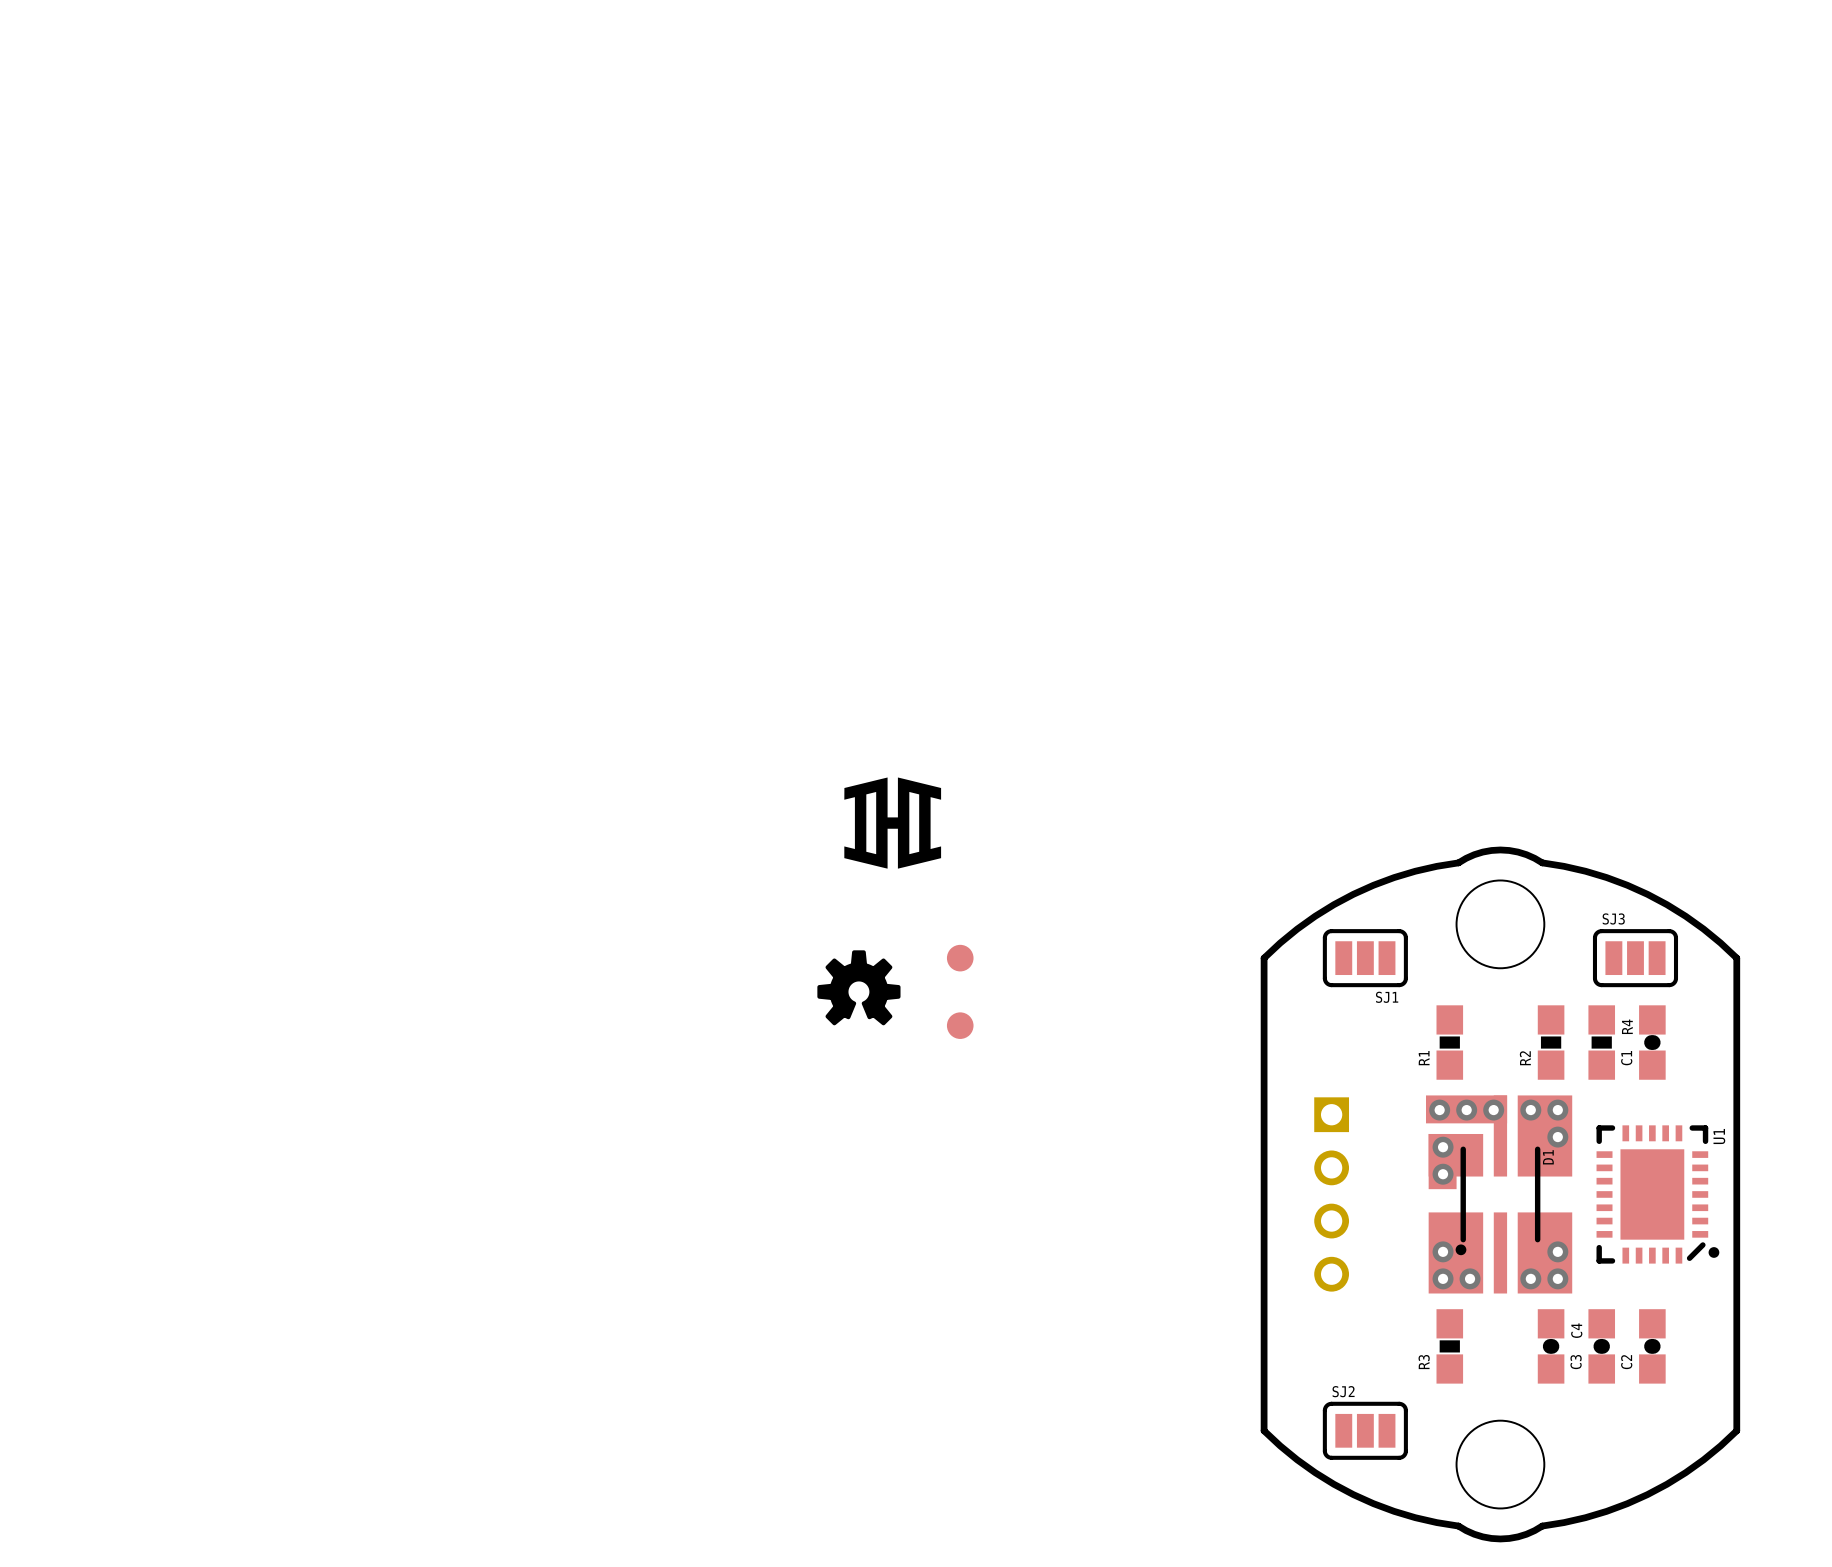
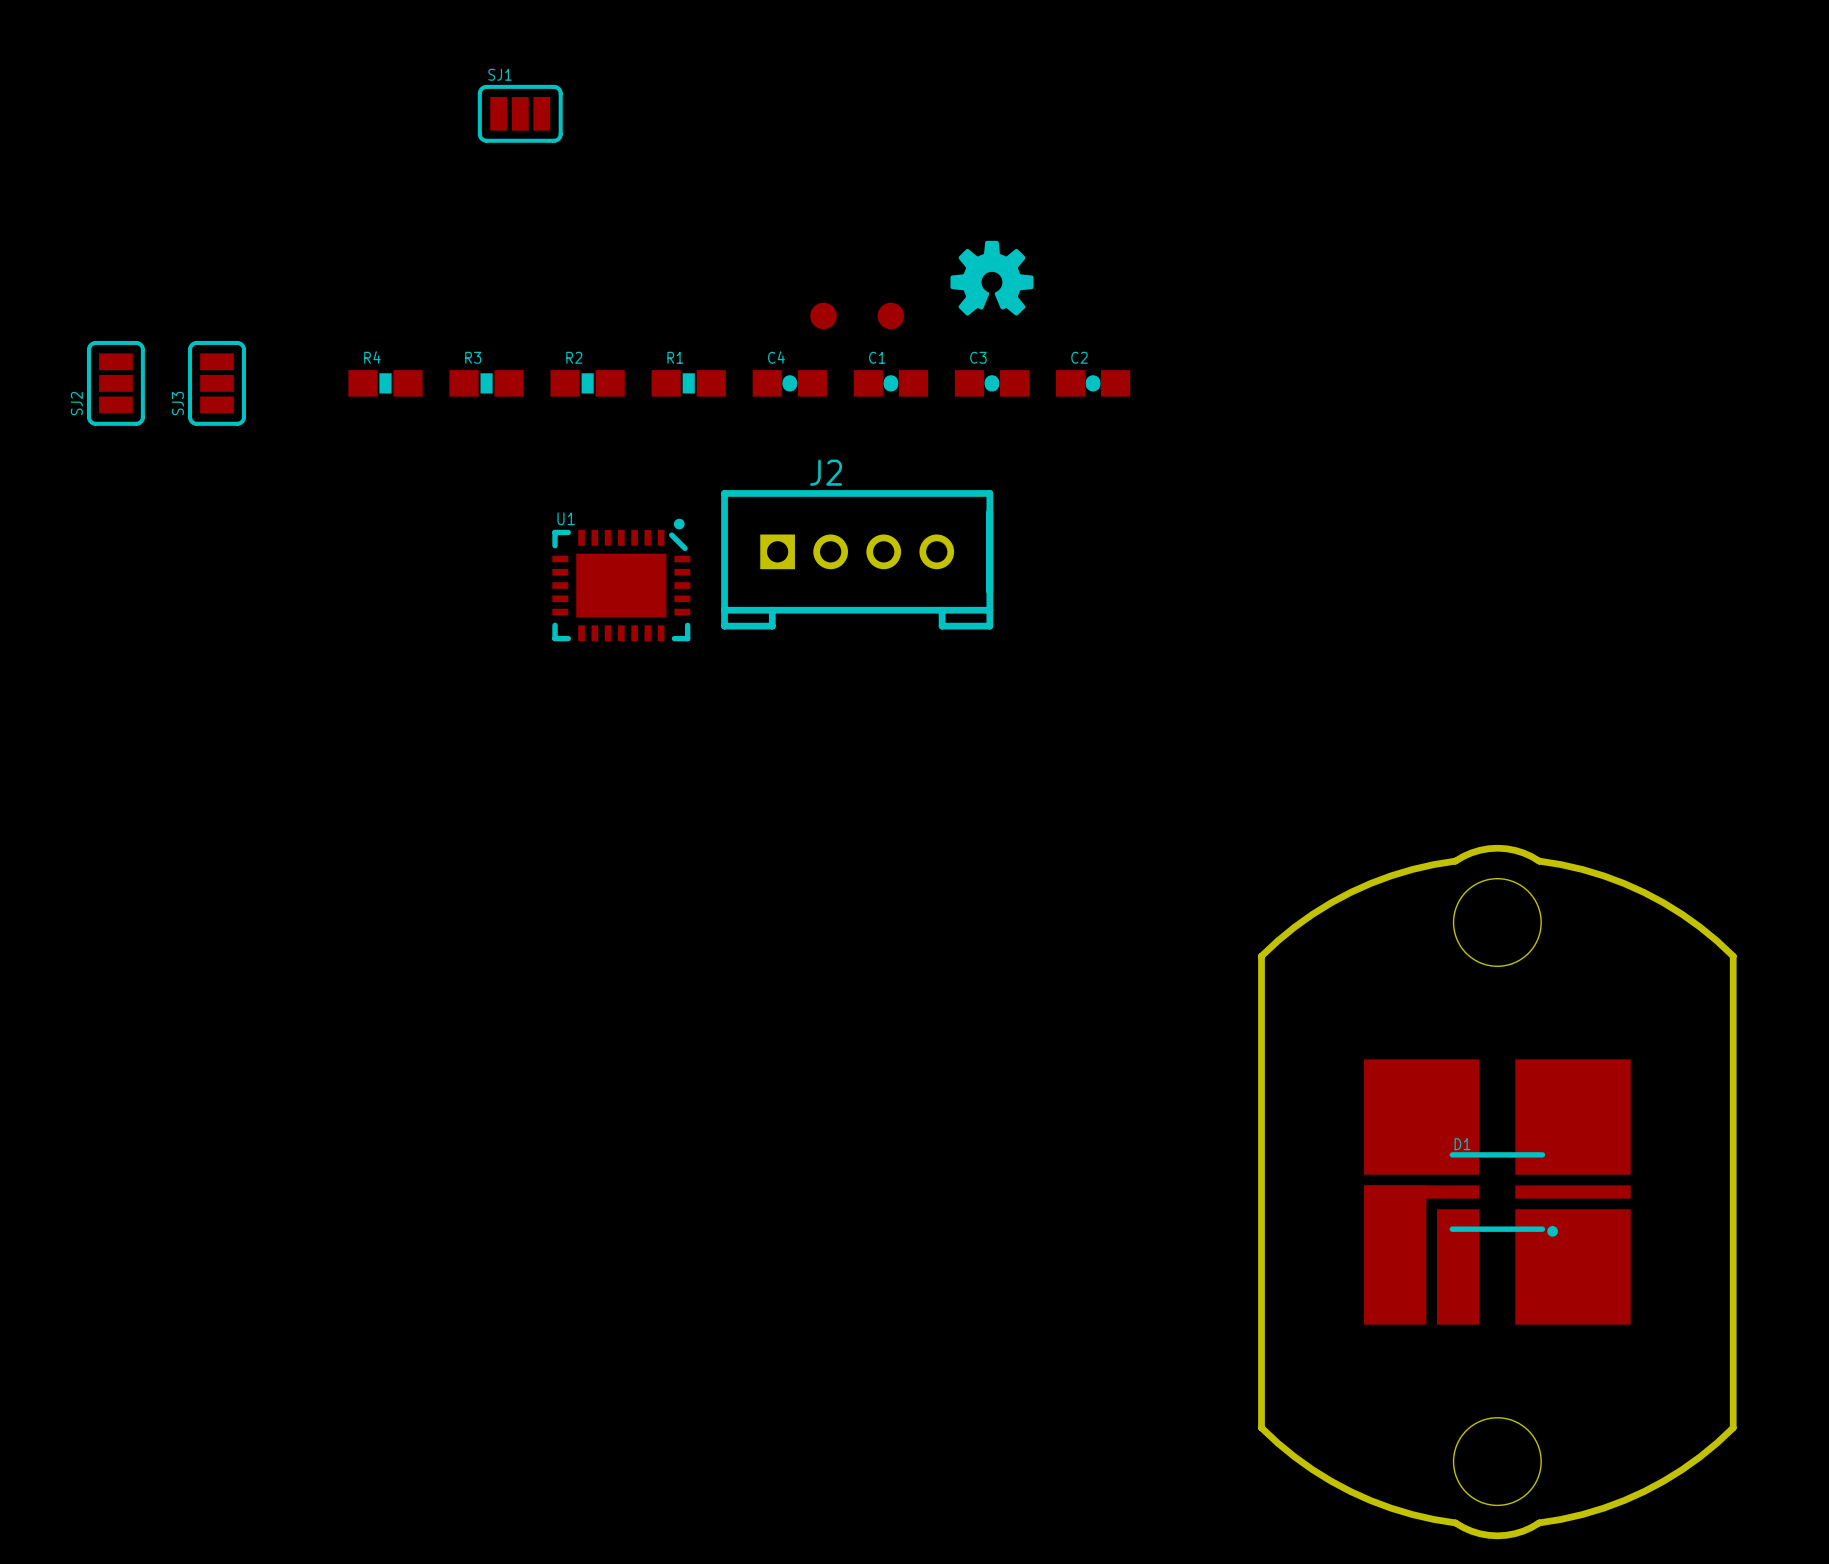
drawing: none -> [950, 240, 1034, 316]
part: none -> (823, 315)
part: none -> (890, 315)
J2: none -> (857, 559)
drawing: [844, 777, 942, 869] -> none
SJ3 name position: SJ3 (1613, 918) -> SJ3 (177, 403)
drawing: [817, 950, 901, 1026] -> none
part: (960, 958) -> none
SJ1 position: (1365, 958) -> (520, 113)
SJ3 rotation: 0° (1635, 958) -> 90° clockwise (217, 383)
SJ3 position: (1635, 958) -> (217, 383)
SJ1 name position: SJ1 (1387, 997) -> SJ1 (500, 74)
part: (960, 1025) -> none
R1 rotation: 0° (1449, 1042) -> 90° clockwise (688, 383)
R1 position: (1449, 1042) -> (688, 383)
R2 rotation: 0° (1551, 1042) -> 90° clockwise (587, 383)
R2 position: (1551, 1042) -> (587, 383)
R4 rotation: 0° (1601, 1042) -> 90° clockwise (385, 383)
R4 position: (1601, 1042) -> (385, 383)
C1 rotation: 0° (1652, 1042) -> 90° clockwise (890, 383)
C1 position: (1652, 1042) -> (890, 383)
D1 footprint: [1426, 1095, 1573, 1294] -> [1364, 1059, 1631, 1325]
via: (1439, 1110) -> none
via: (1466, 1110) -> none
via: (1493, 1110) -> none
via: (1530, 1110) -> none
via: (1557, 1110) -> none
via: (1557, 1137) -> none
via: (1443, 1147) -> none
D1 name position: D1 (1548, 1157) -> D1 (1462, 1144)
via: (1443, 1174) -> none
part: (1331, 1194) -> none
U1 rotation: 0° (1657, 1194) -> 90° counterclockwise (621, 580)
U1 position: (1657, 1194) -> (621, 580)
via: (1443, 1251) -> none
via: (1557, 1251) -> none
via: (1443, 1278) -> none
via: (1470, 1278) -> none
via: (1530, 1278) -> none
via: (1557, 1278) -> none
R3 rotation: 0° (1449, 1346) -> 90° clockwise (486, 383)
R3 position: (1449, 1346) -> (486, 383)
C4 rotation: 0° (1551, 1346) -> 90° clockwise (789, 383)
C4 position: (1551, 1346) -> (789, 383)
C3 rotation: 0° (1601, 1346) -> 90° clockwise (991, 383)
C3 position: (1601, 1346) -> (991, 383)
C2 rotation: 0° (1652, 1346) -> 90° clockwise (1093, 383)
C2 position: (1652, 1346) -> (1093, 383)
SJ2 name position: SJ2 (1343, 1391) -> SJ2 (76, 403)
SJ2 rotation: 0° (1365, 1430) -> 90° clockwise (115, 383)
SJ2 position: (1365, 1430) -> (115, 383)

